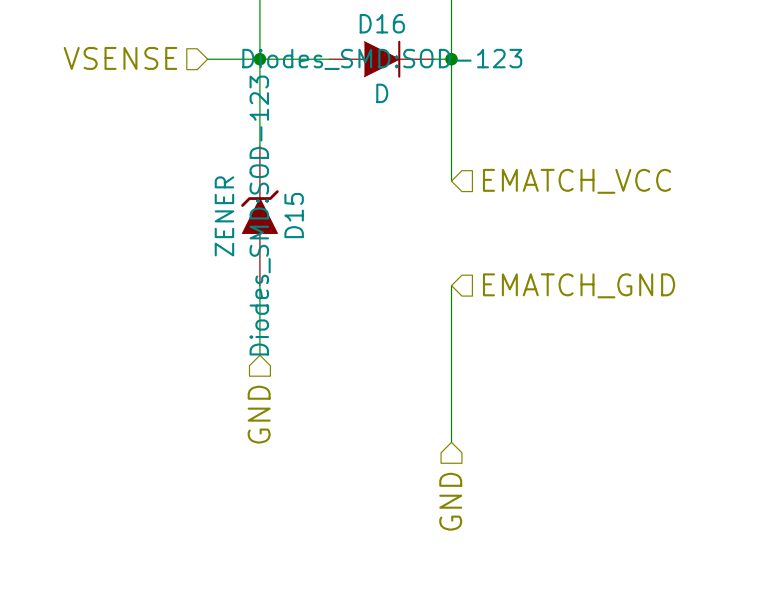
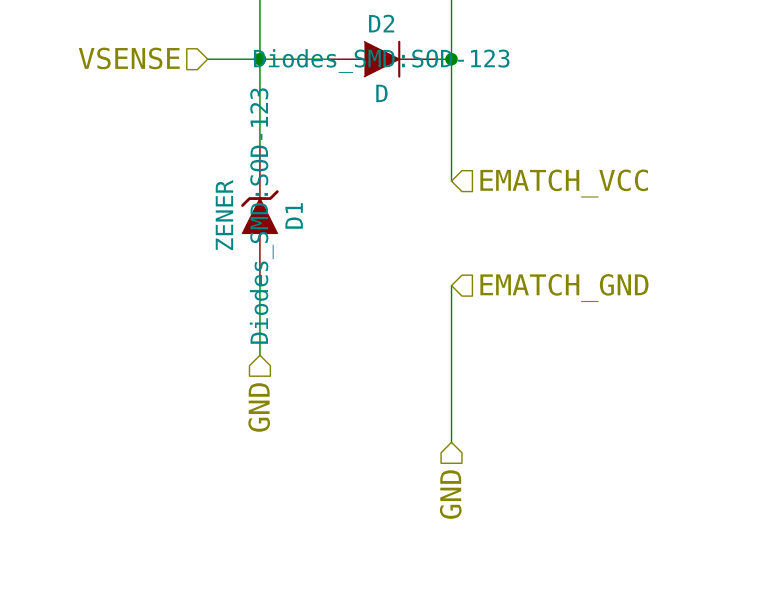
D16 name: D16 (382, 23) -> D2 (381, 23)
D15 name: D15 (294, 215) -> D1 (294, 215)

